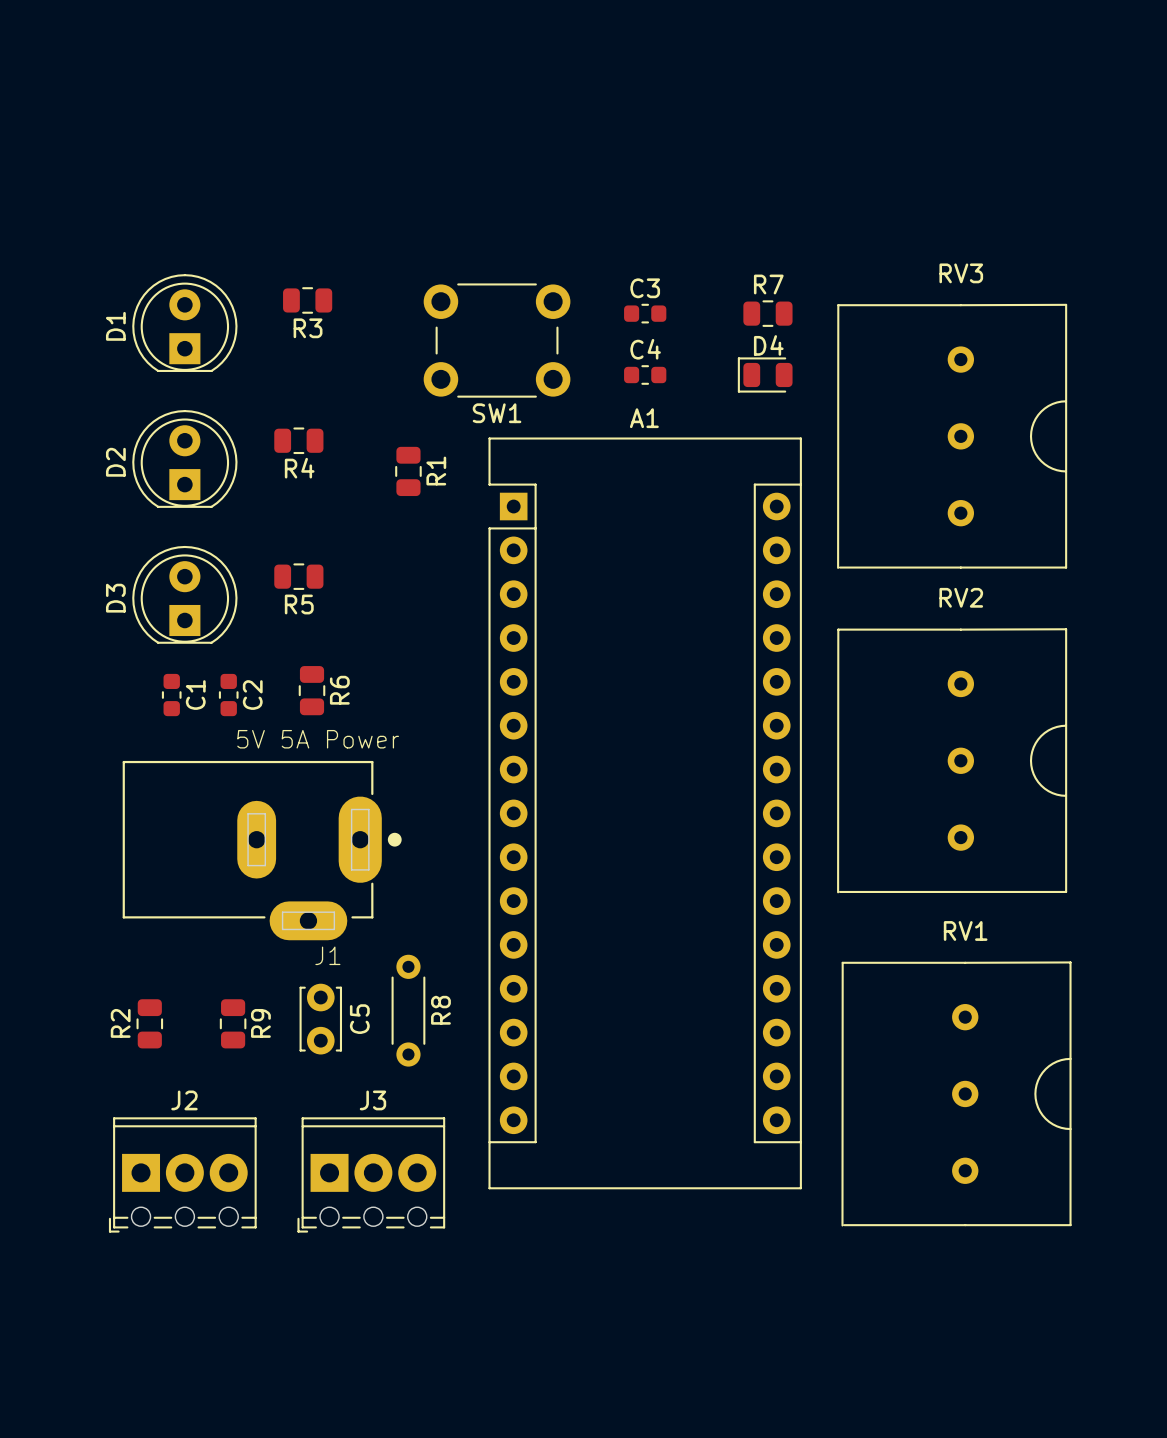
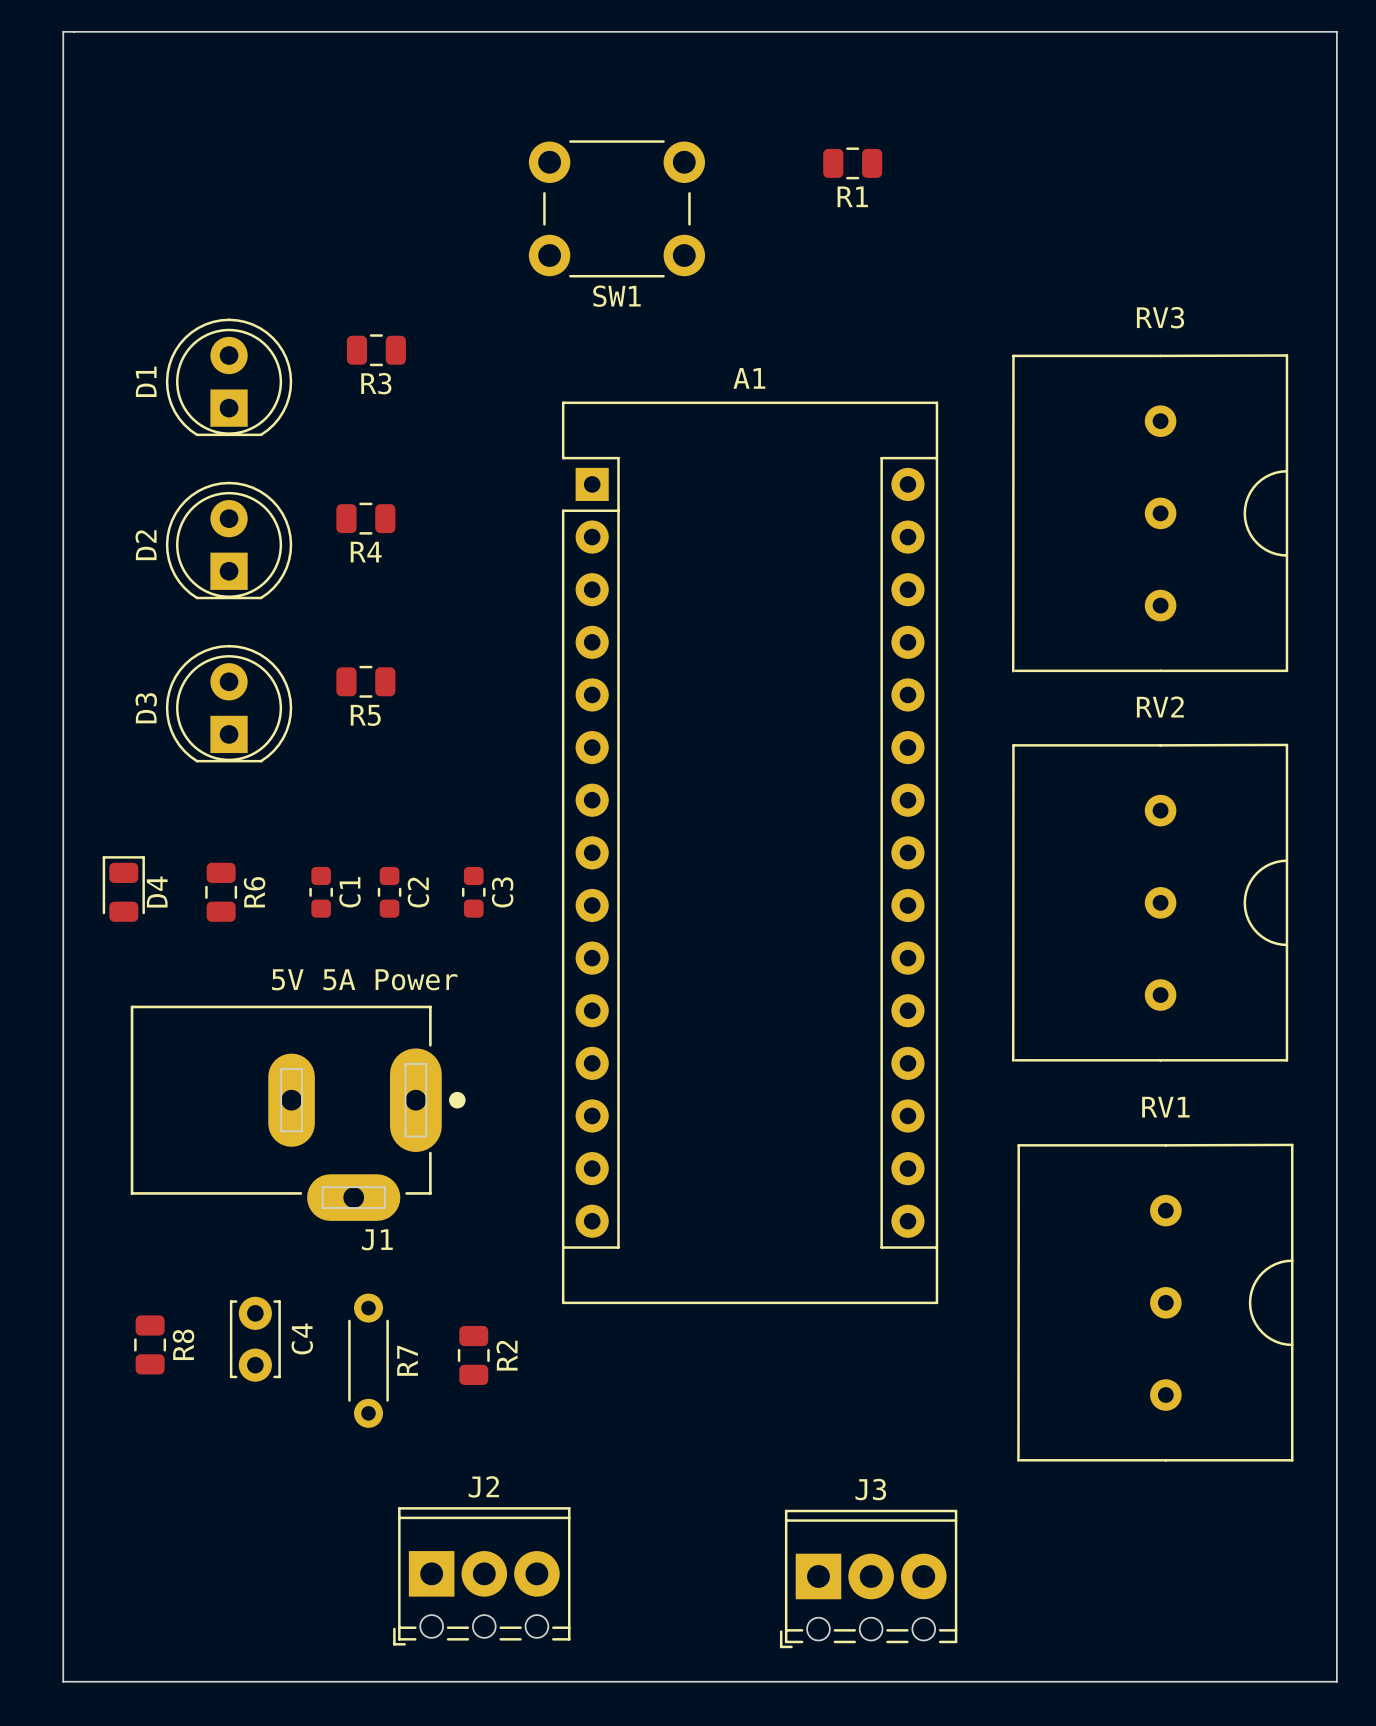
board edge: none -> (63, 31) (1336, 31) (1336, 1681) (63, 1681) (63, 31)
R7 name position: R7 (768, 284) -> R7 (407, 1360)
R7 footprint: [743, 300, 793, 327] -> [348, 1293, 389, 1428]
C3 rotation: 0° (645, 313) -> 90° clockwise (473, 892)
C3 position: (645, 313) -> (473, 892)
SW1 position: (497, 340) -> (616, 208)
C4 name position: C4 (645, 349) -> C4 (302, 1338)
C4 footprint: [624, 365, 667, 385] -> [229, 1296, 281, 1382]
D4 rotation: 0° (765, 374) -> 90° clockwise (123, 888)
D4 position: (765, 374) -> (123, 888)
R1 rotation: 0° (408, 471) -> 90° clockwise (852, 163)
R1 position: (408, 471) -> (852, 163)
R6 position: (312, 690) -> (221, 892)
C1 position: (171, 695) -> (321, 892)
C2 position: (228, 695) -> (389, 892)
A1 position: (645, 813) -> (750, 852)
J1 position: (262, 850) -> (298, 1113)
R8 footprint: [391, 954, 426, 1067] -> [134, 1315, 167, 1375]
C5: (320, 1019) -> none
R2 name position: R2 (120, 1023) -> R2 (507, 1355)
R2 position: (149, 1023) -> (473, 1355)
R9: (233, 1023) -> none
J2 position: (182, 1174) -> (481, 1576)
J3 position: (371, 1174) -> (868, 1578)

